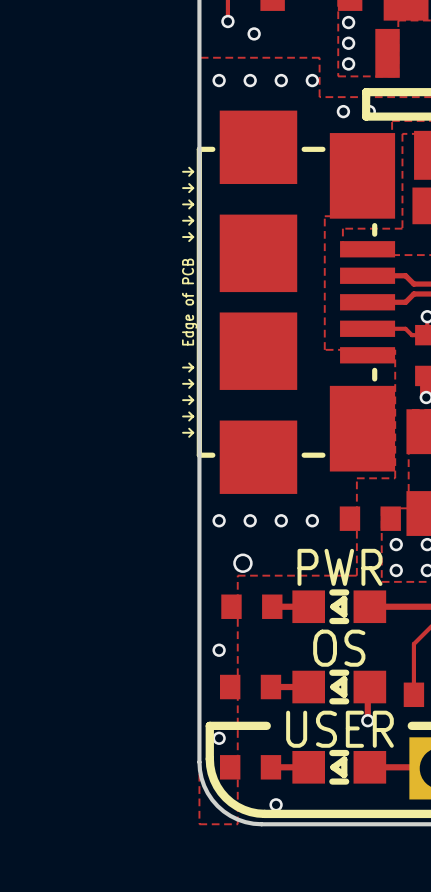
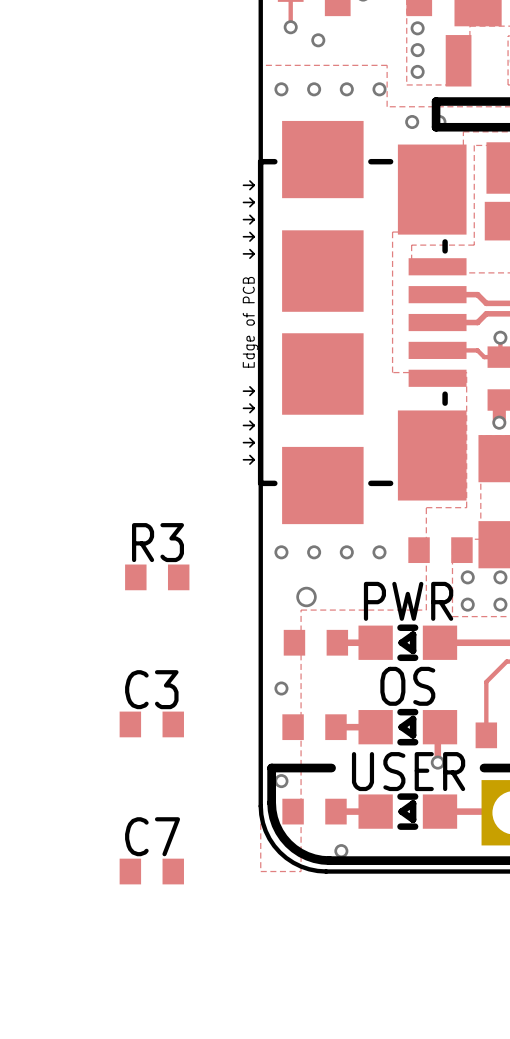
R3: none -> (157, 577)
C3: none -> (151, 724)
C7: none -> (151, 871)

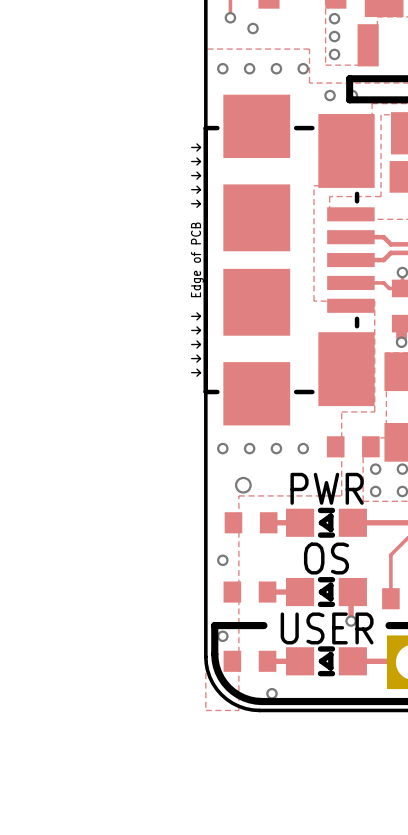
R3: (157, 577) -> none
C3: (151, 724) -> none
C7: (151, 871) -> none

